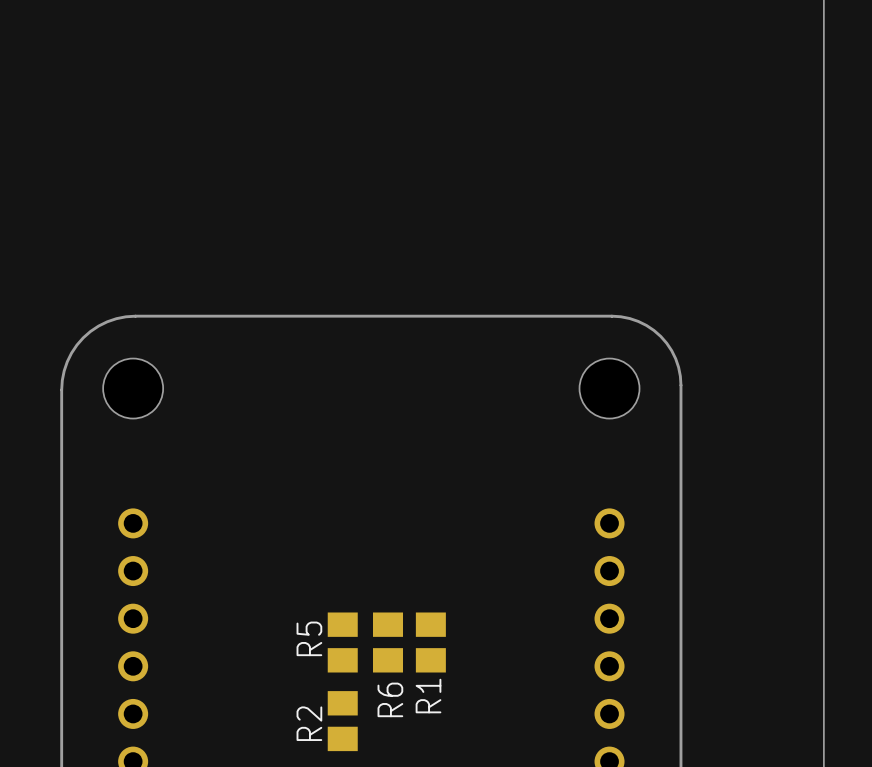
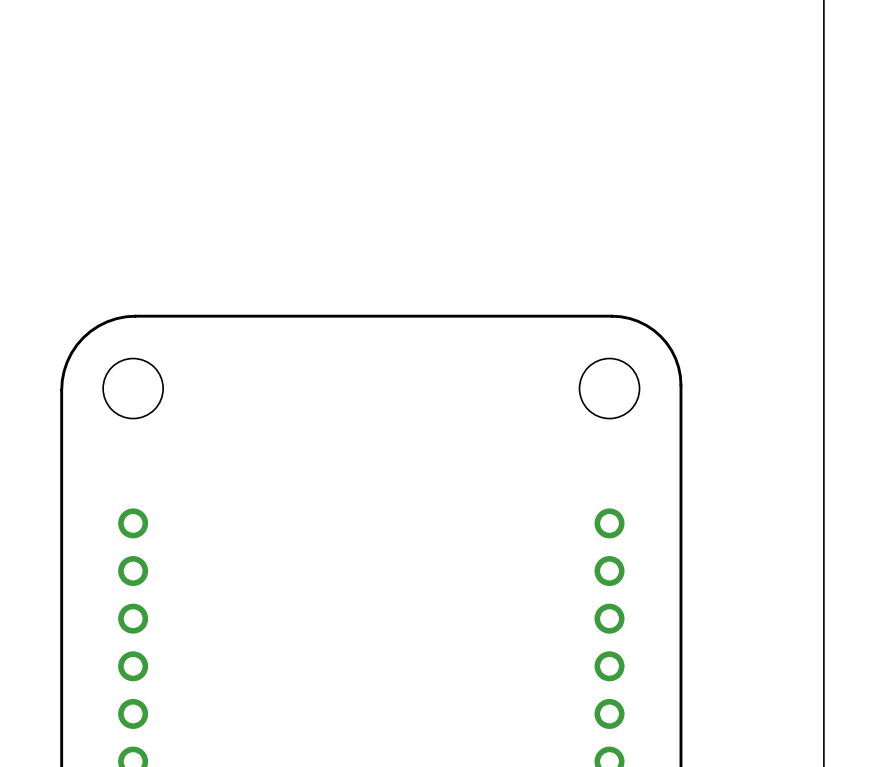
R5: (342, 642) -> none
R6: (388, 642) -> none
R1: (430, 642) -> none
R2: (342, 721) -> none

